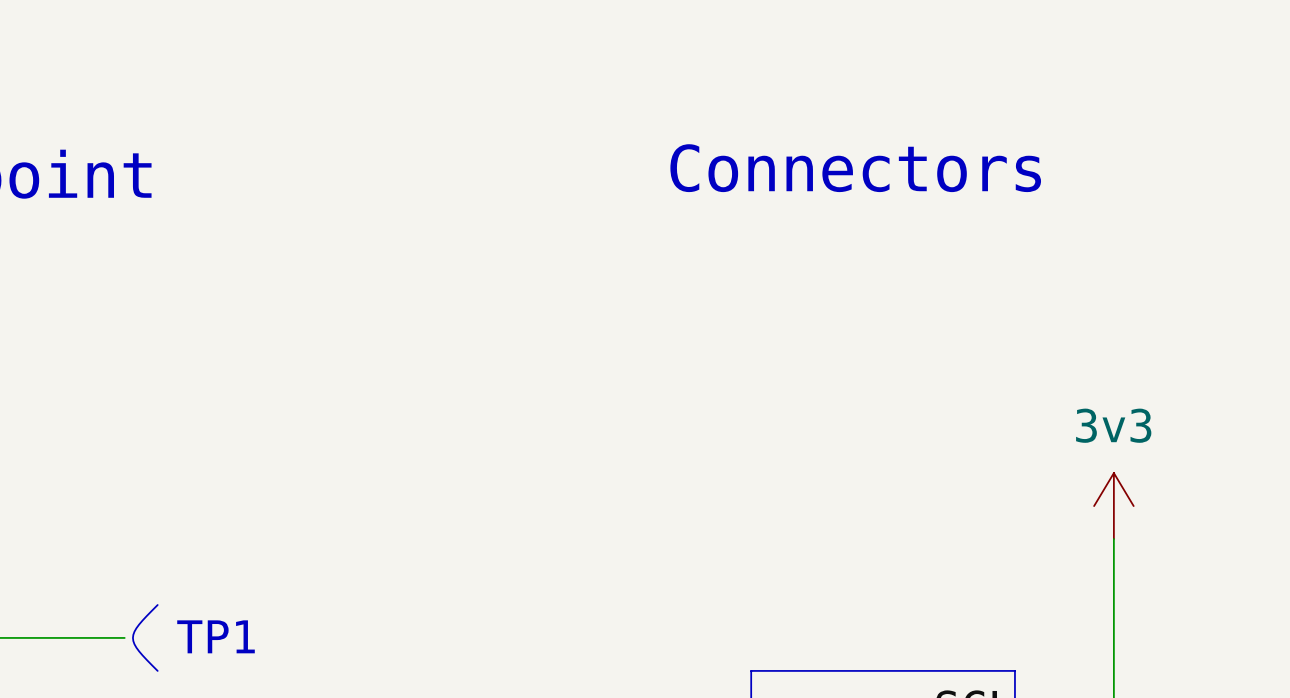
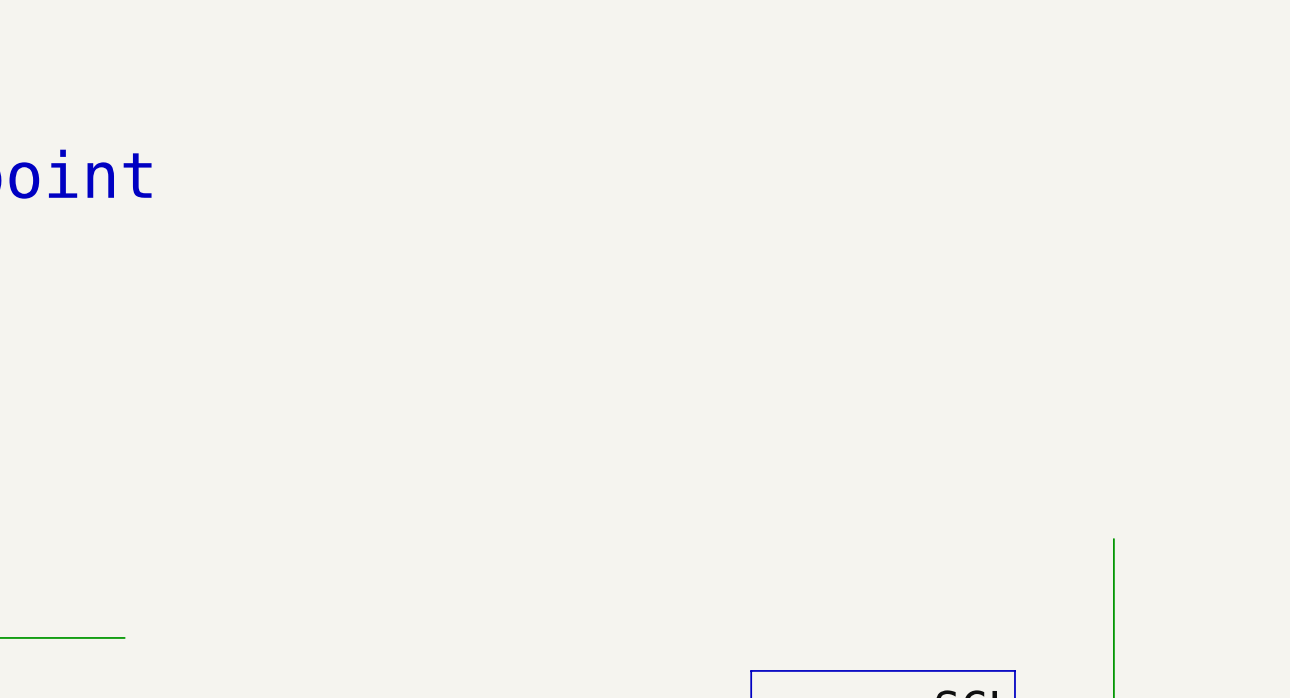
text: Connectors (855, 168) -> none
power symbol: 3v3 (1113, 506) -> none
line: (157, 604) (139, 624) (132, 637) (139, 651) (157, 670) -> none
text: TP1 (216, 636) -> none

